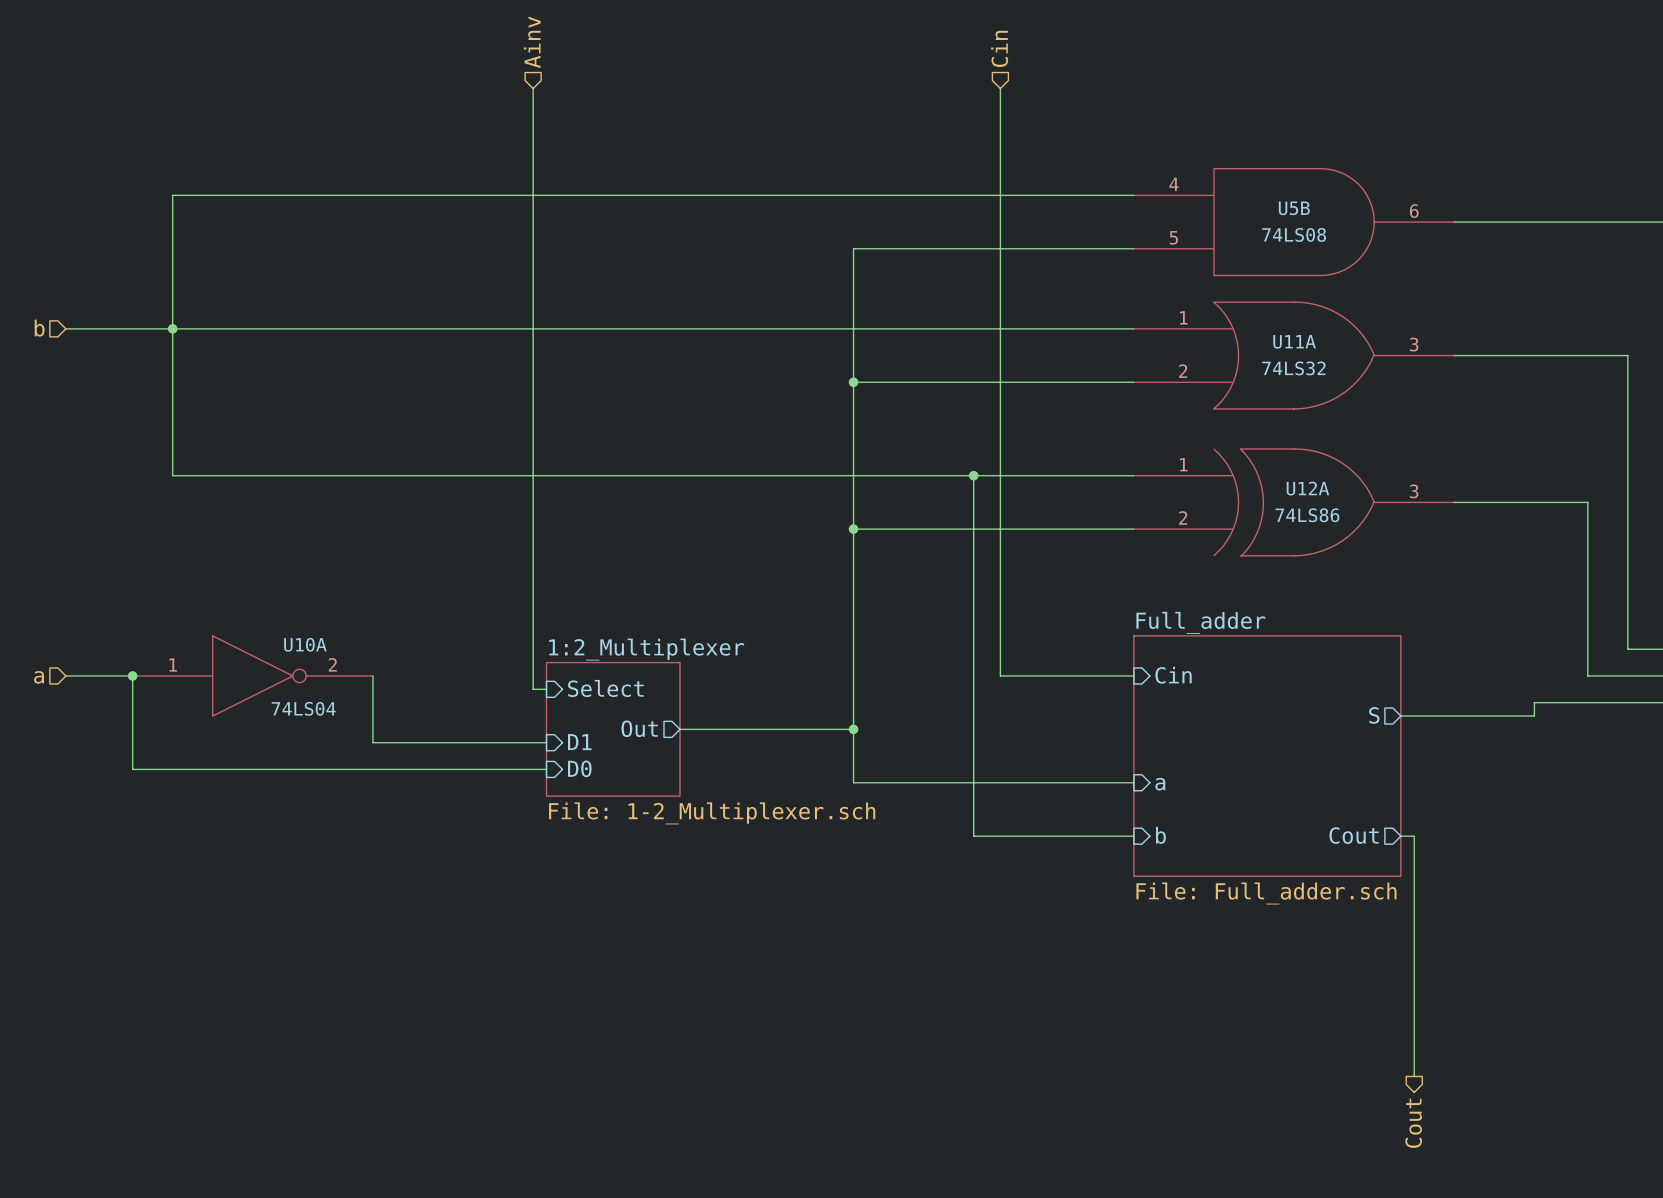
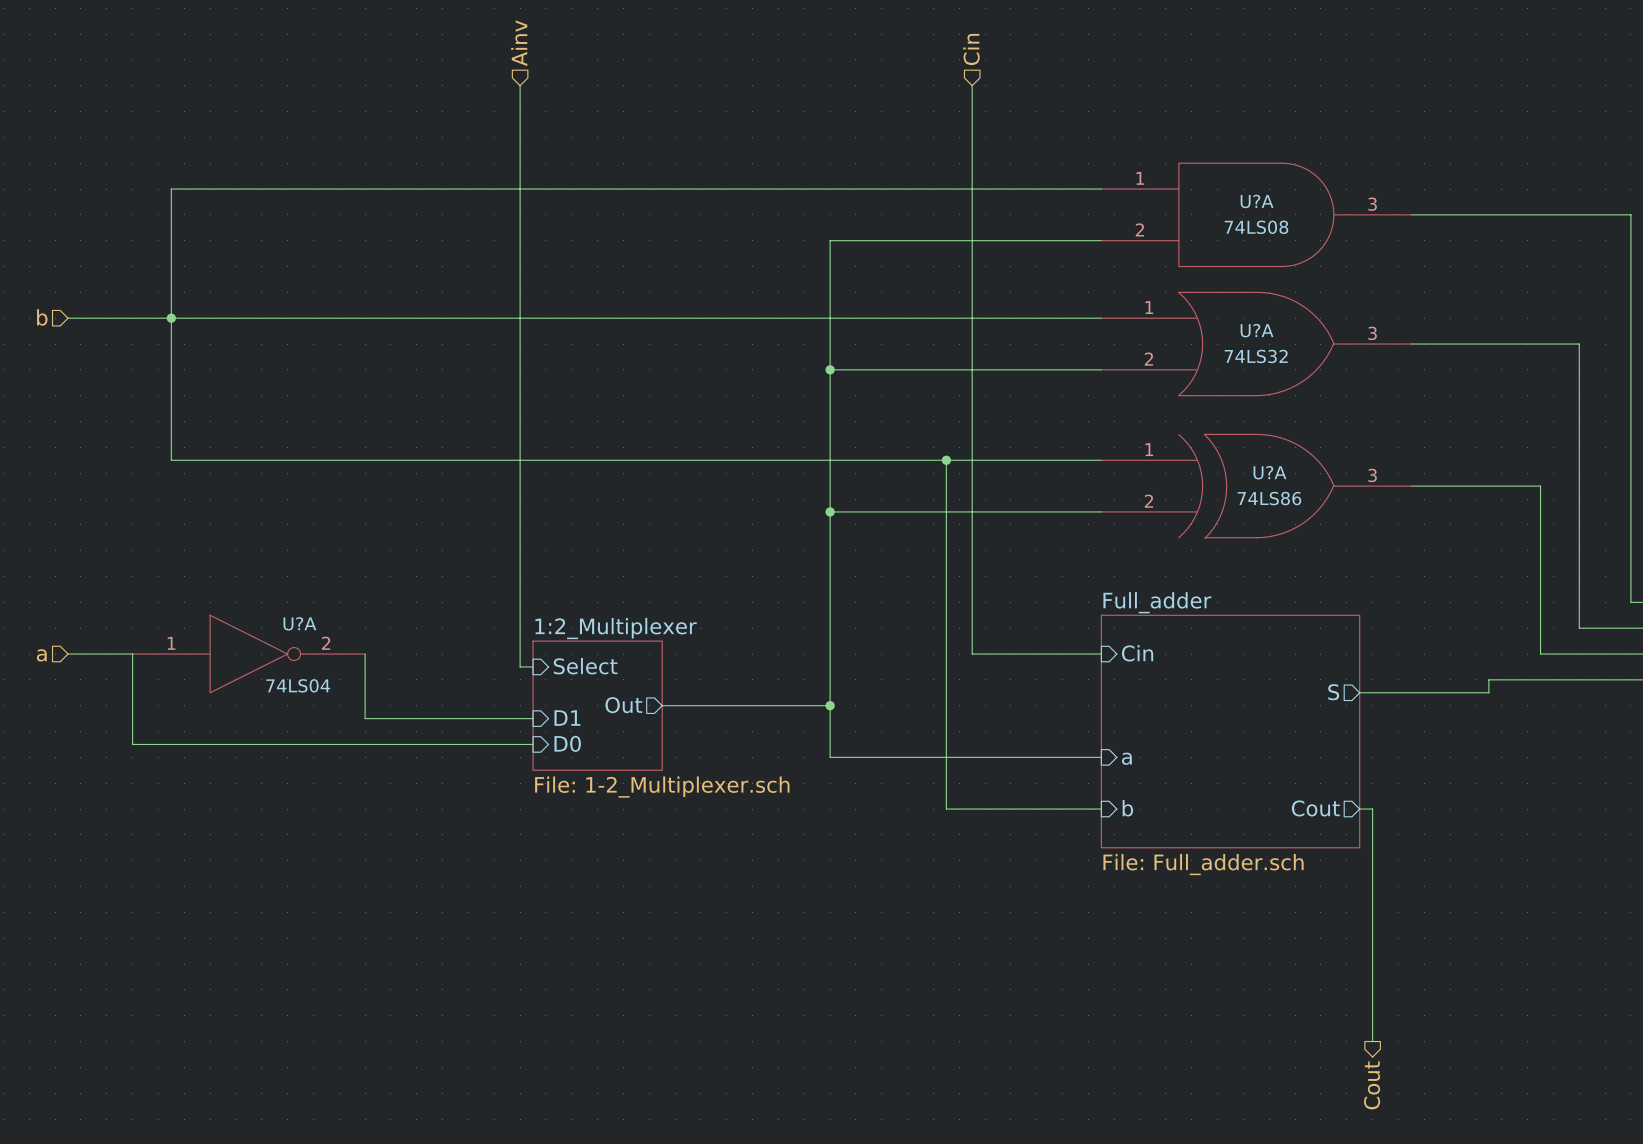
U5B pin number: 4 (1173, 184) -> 1 (1140, 178)
U5B name: U5B (1294, 208) -> U?A (1257, 201)
U5B pin number: 6 (1414, 211) -> 3 (1372, 204)
U5B pin number: 5 (1173, 237) -> 2 (1139, 229)
U11A name: U11A (1294, 341) -> U?A (1257, 330)
U12A name: U12A (1307, 488) -> U?A (1269, 472)
U10A name: U10A (305, 644) -> U?A (299, 623)
junction: (132, 675) -> none

